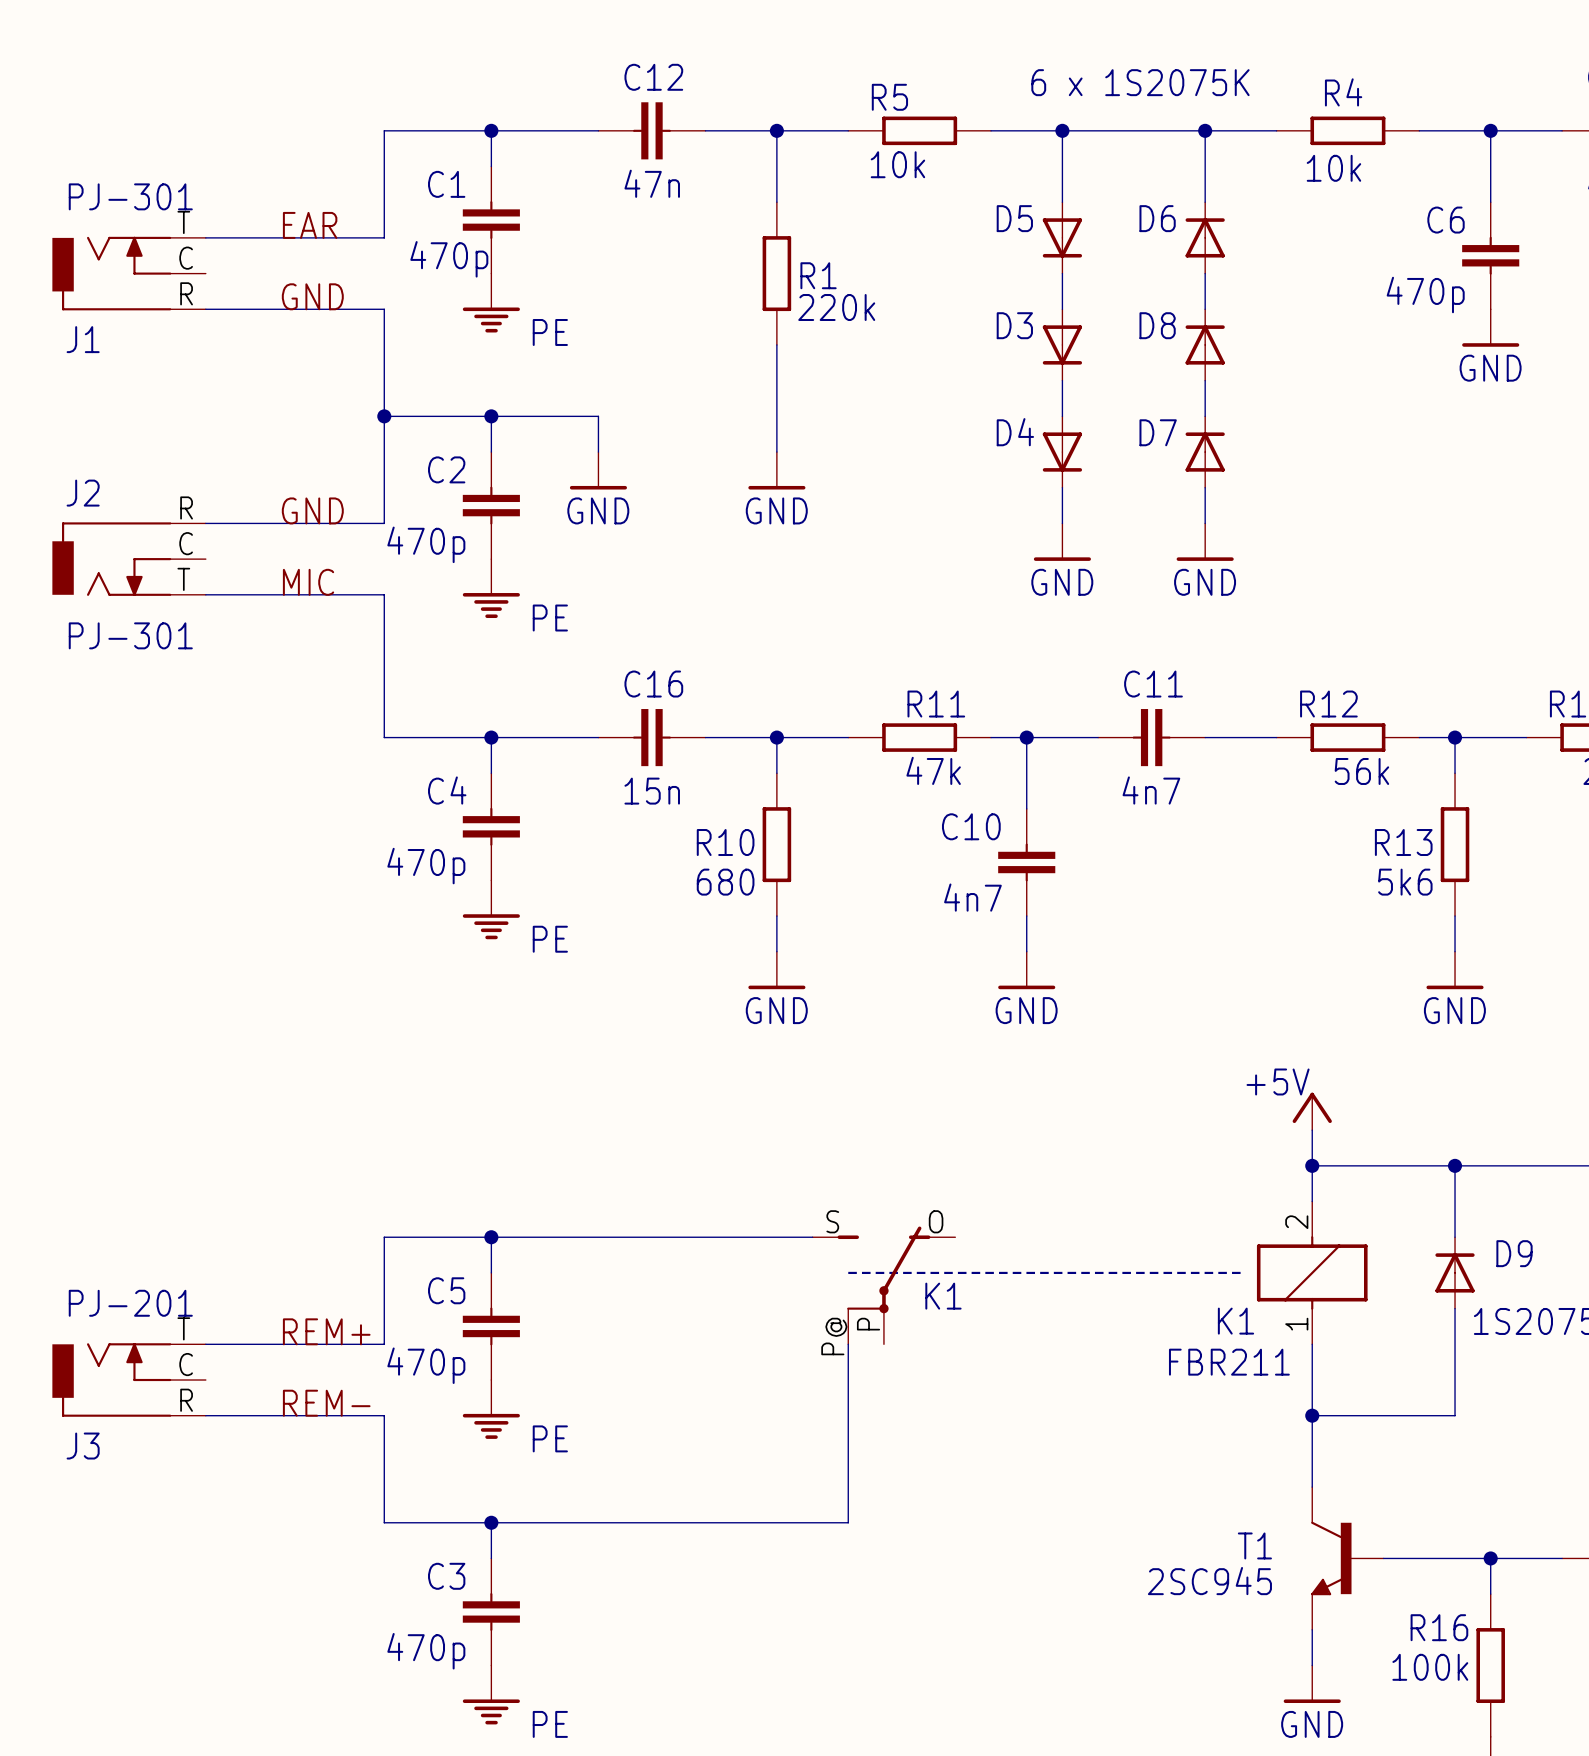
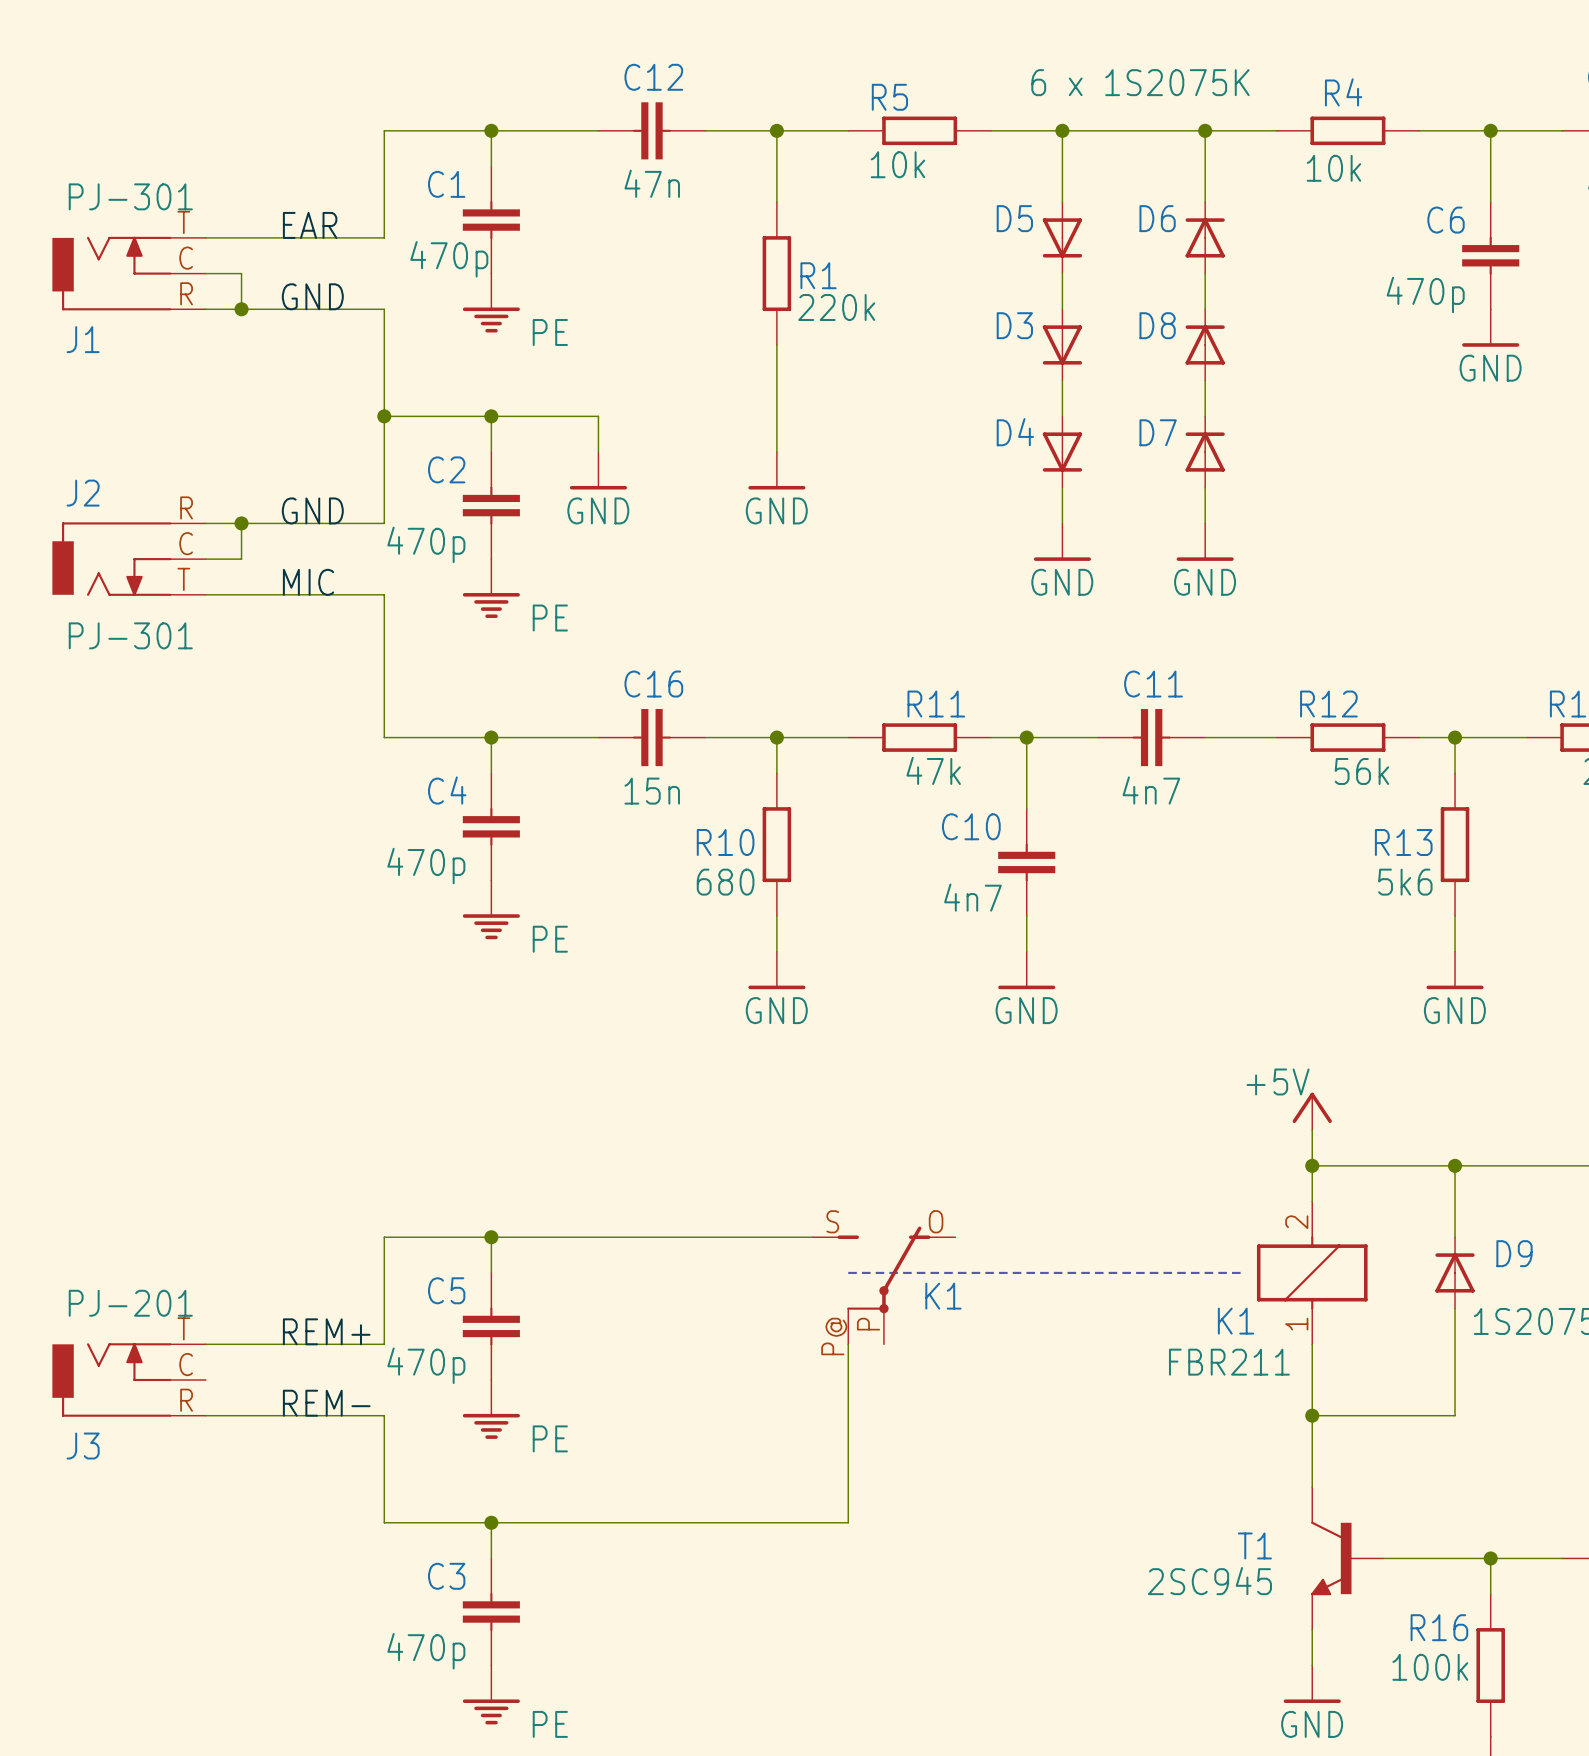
wire: none -> (205, 273) (241, 273) (241, 309)
junction: none -> (241, 309)
wire: none -> (241, 523) (241, 559) (205, 559)
junction: none -> (241, 523)

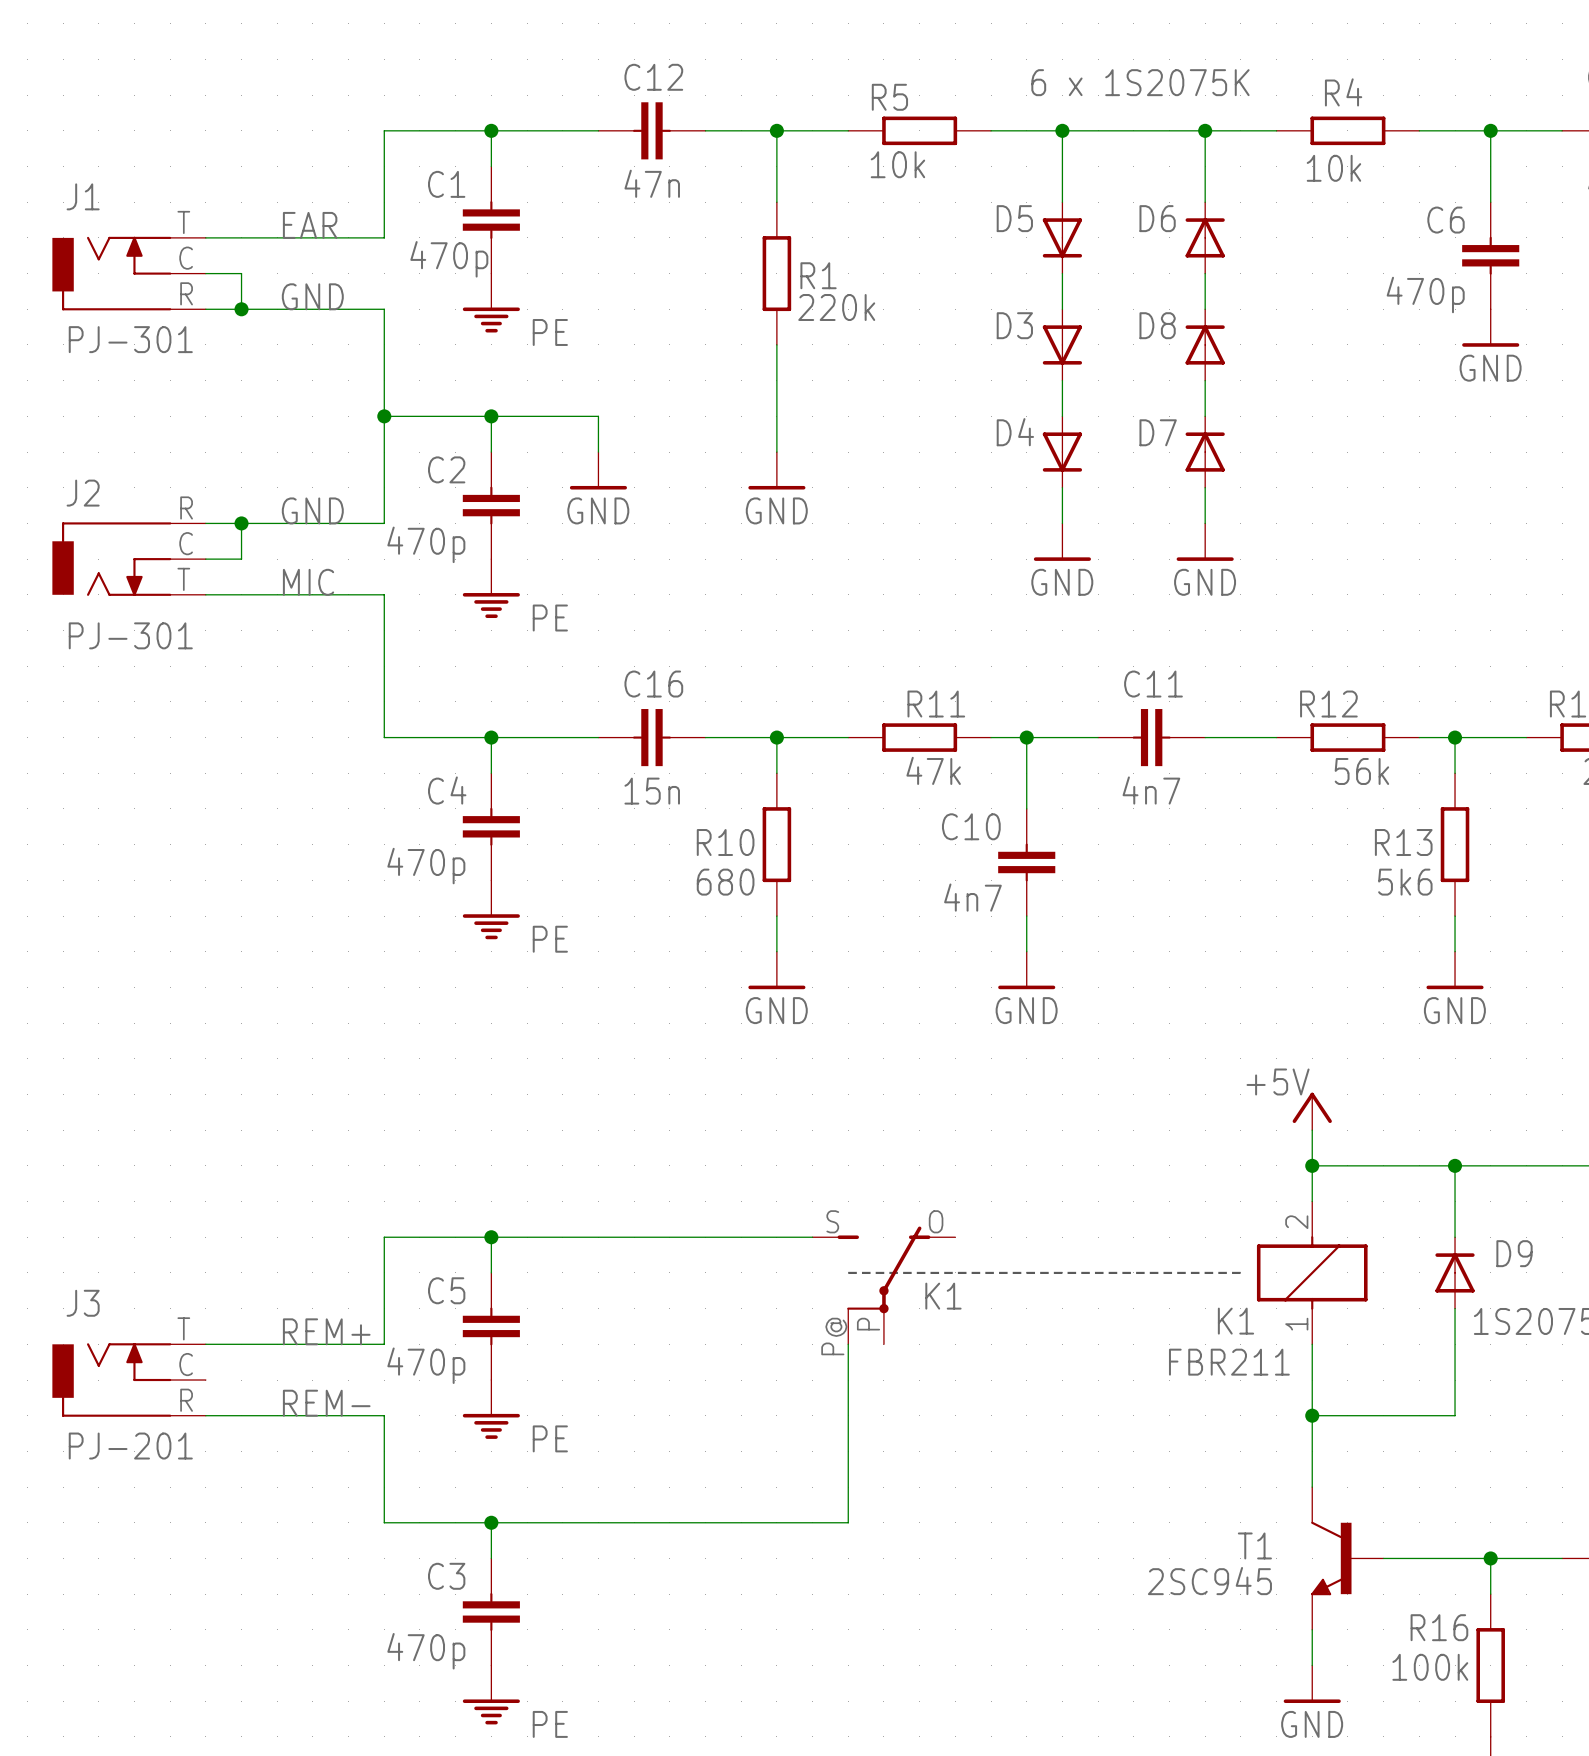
J1 value position: PJ-301 (130, 196) -> PJ-301 (130, 339)
J1 name position: J1 (83, 339) -> J1 (83, 196)
J3 value position: PJ-201 (130, 1303) -> PJ-201 (130, 1446)
J3 name position: J3 (83, 1446) -> J3 (83, 1303)

